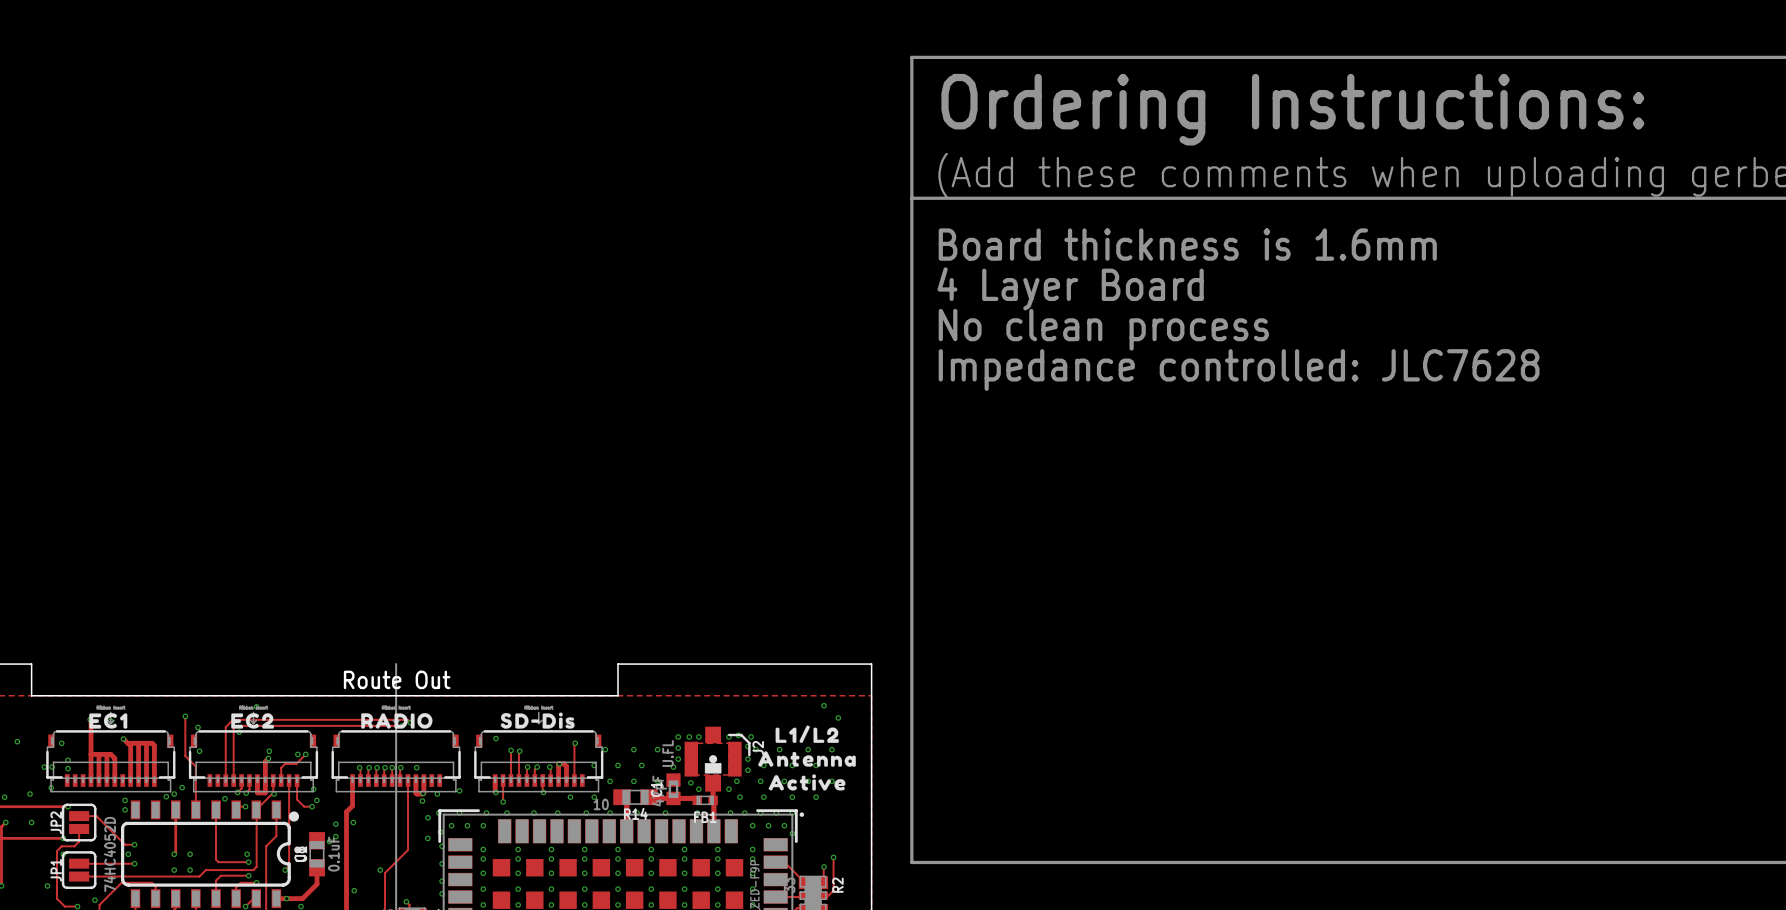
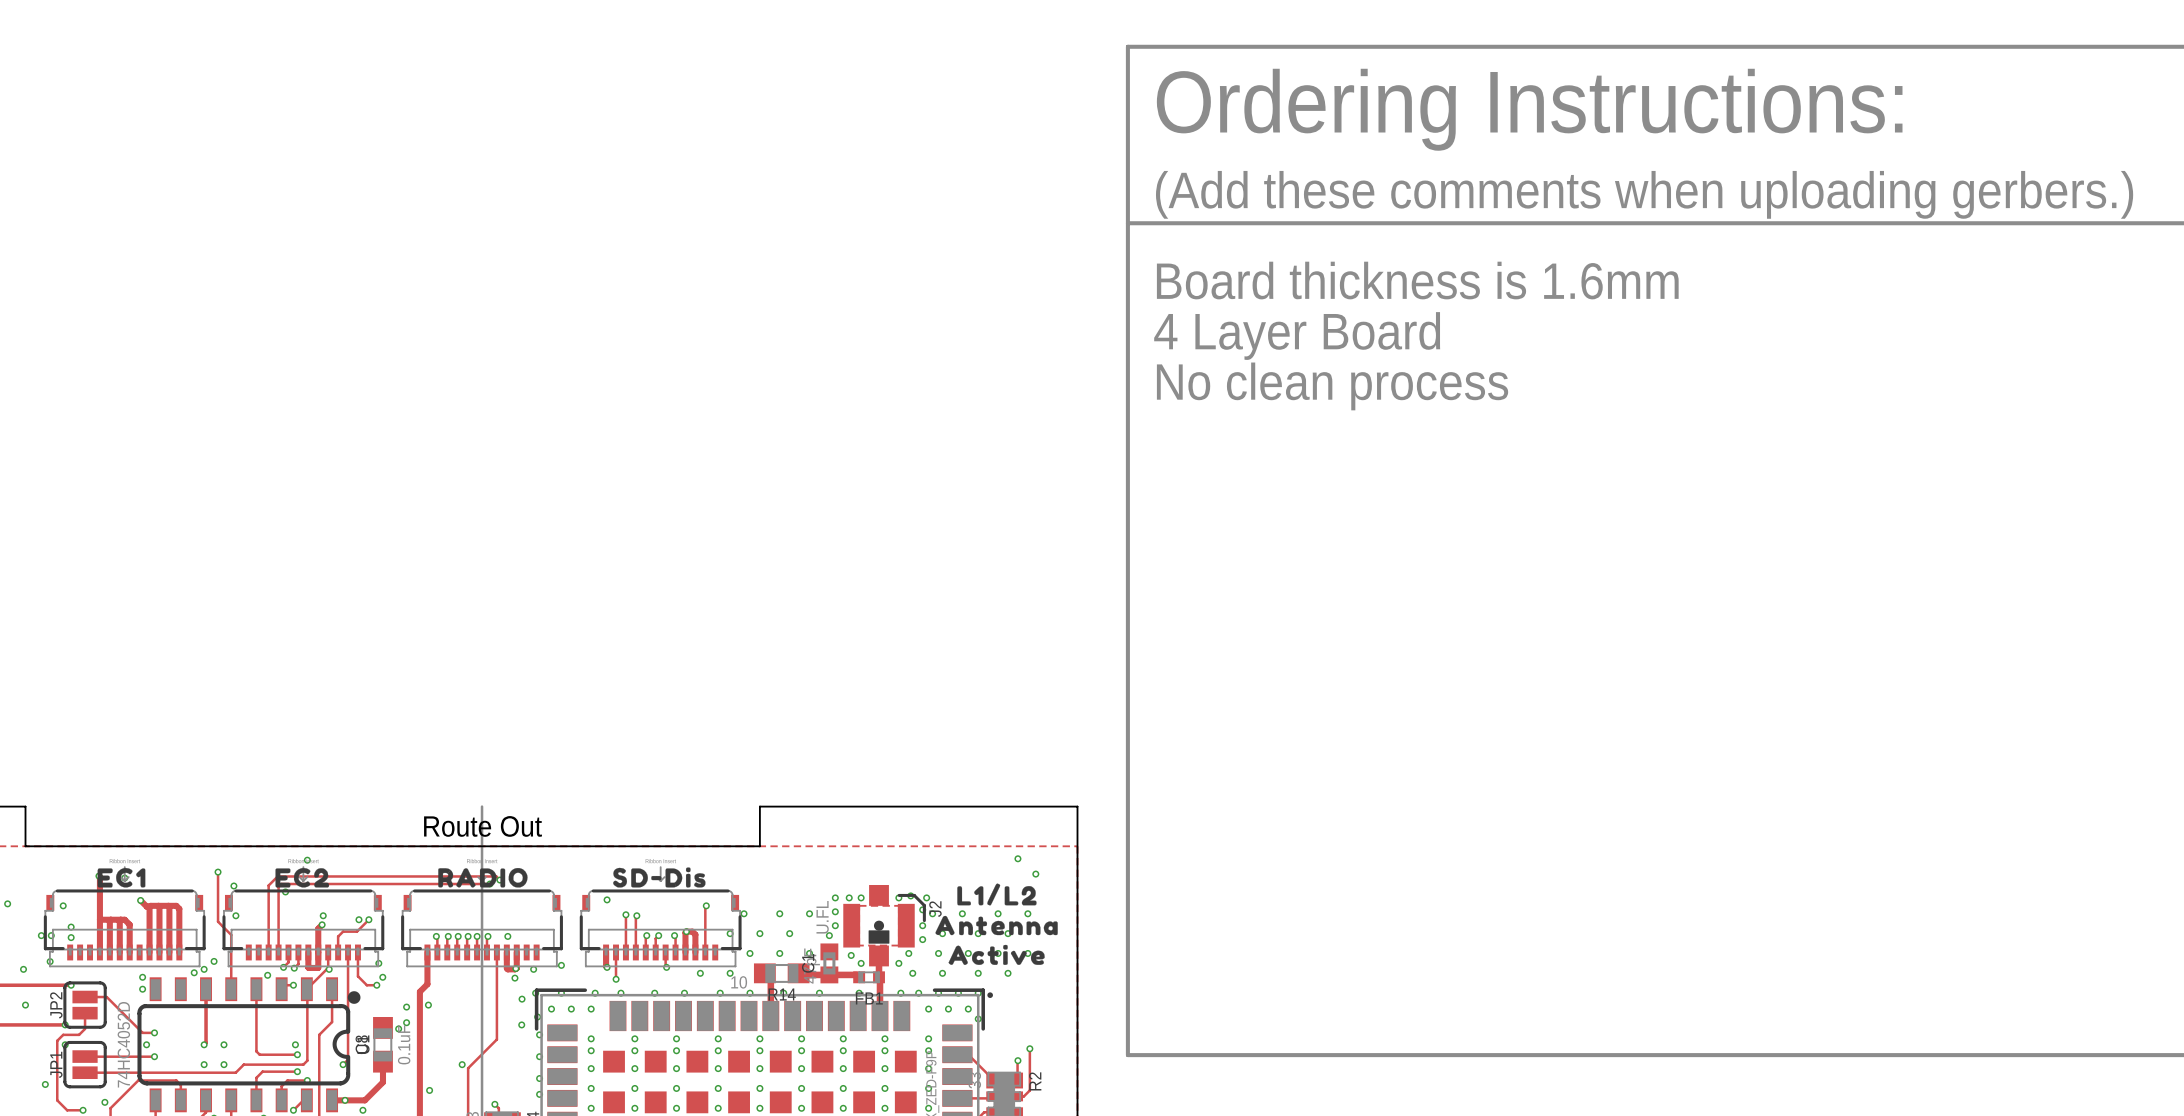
text: Impedance controlled: JLC7628 (1239, 370) -> none

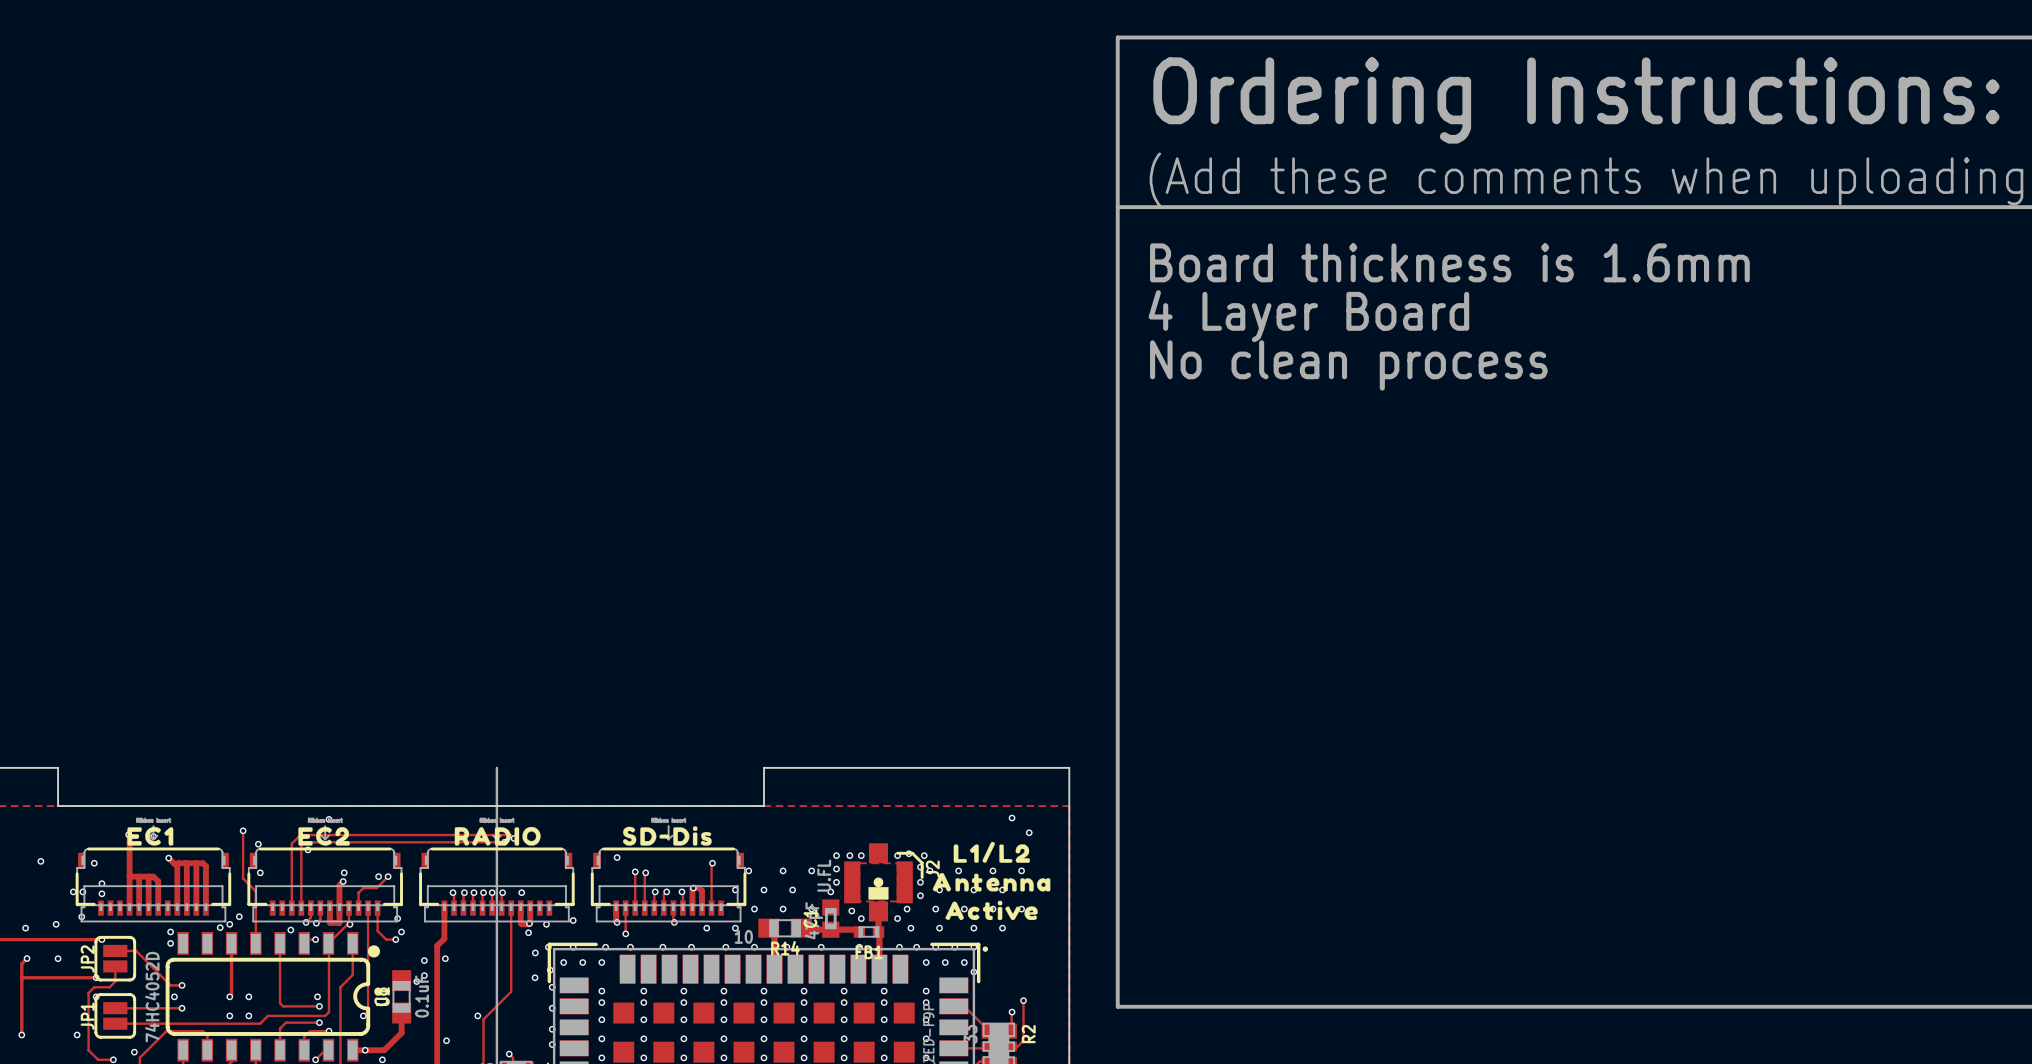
text: Route Out (483, 826) -> none

